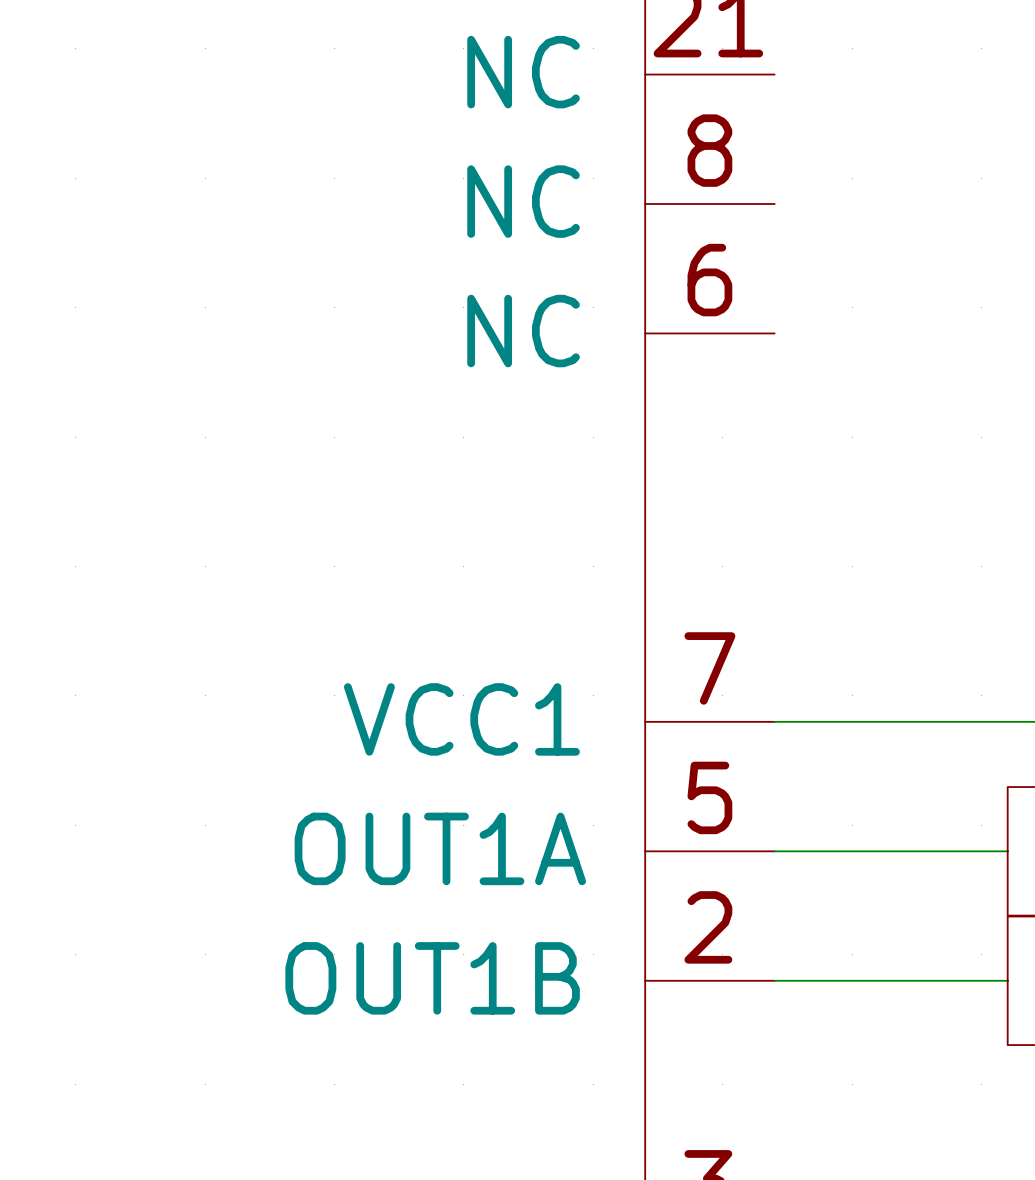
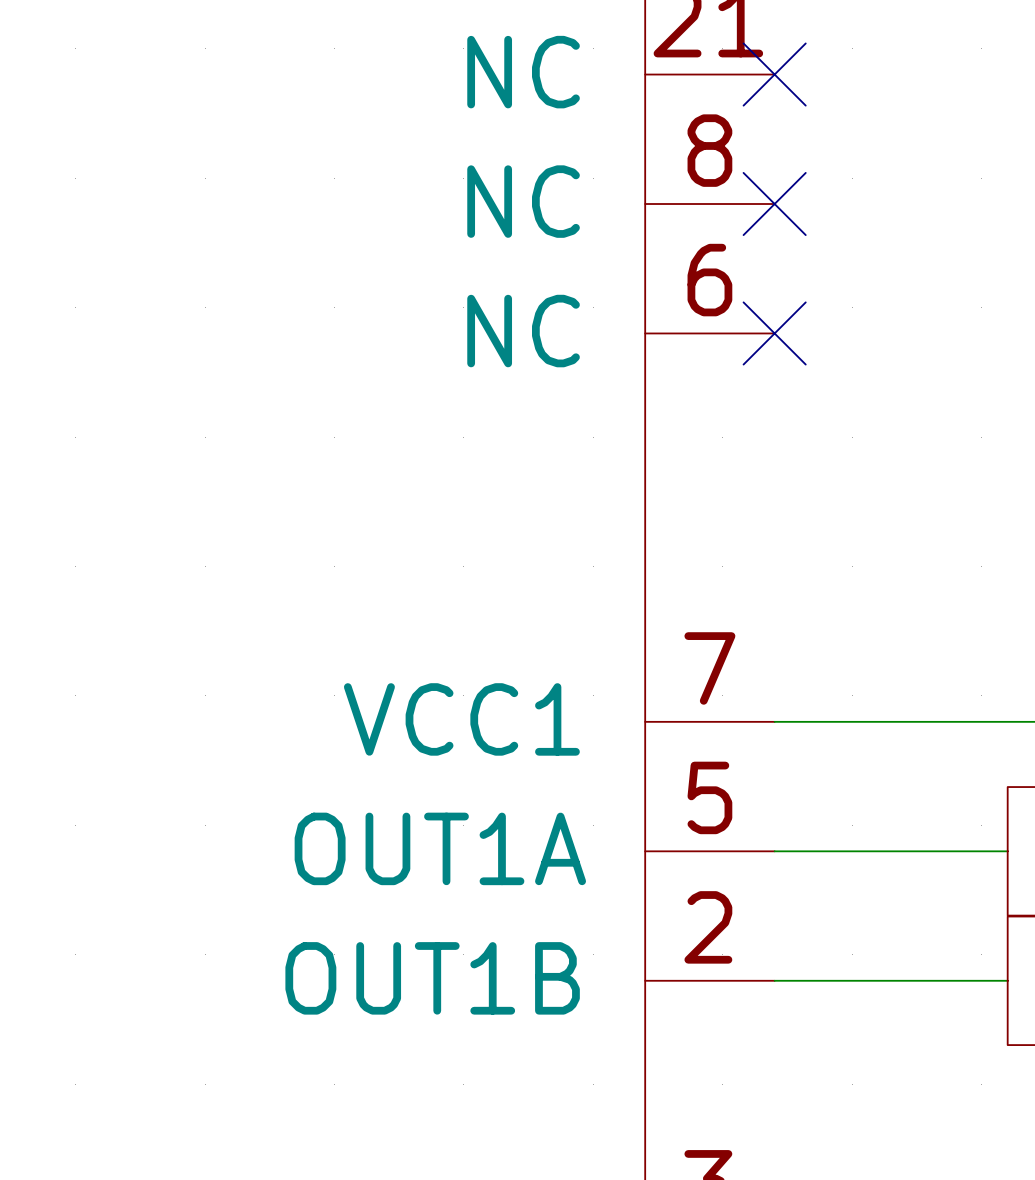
no-connect mark: none -> (774, 74)
no-connect mark: none -> (774, 204)
no-connect mark: none -> (774, 333)

